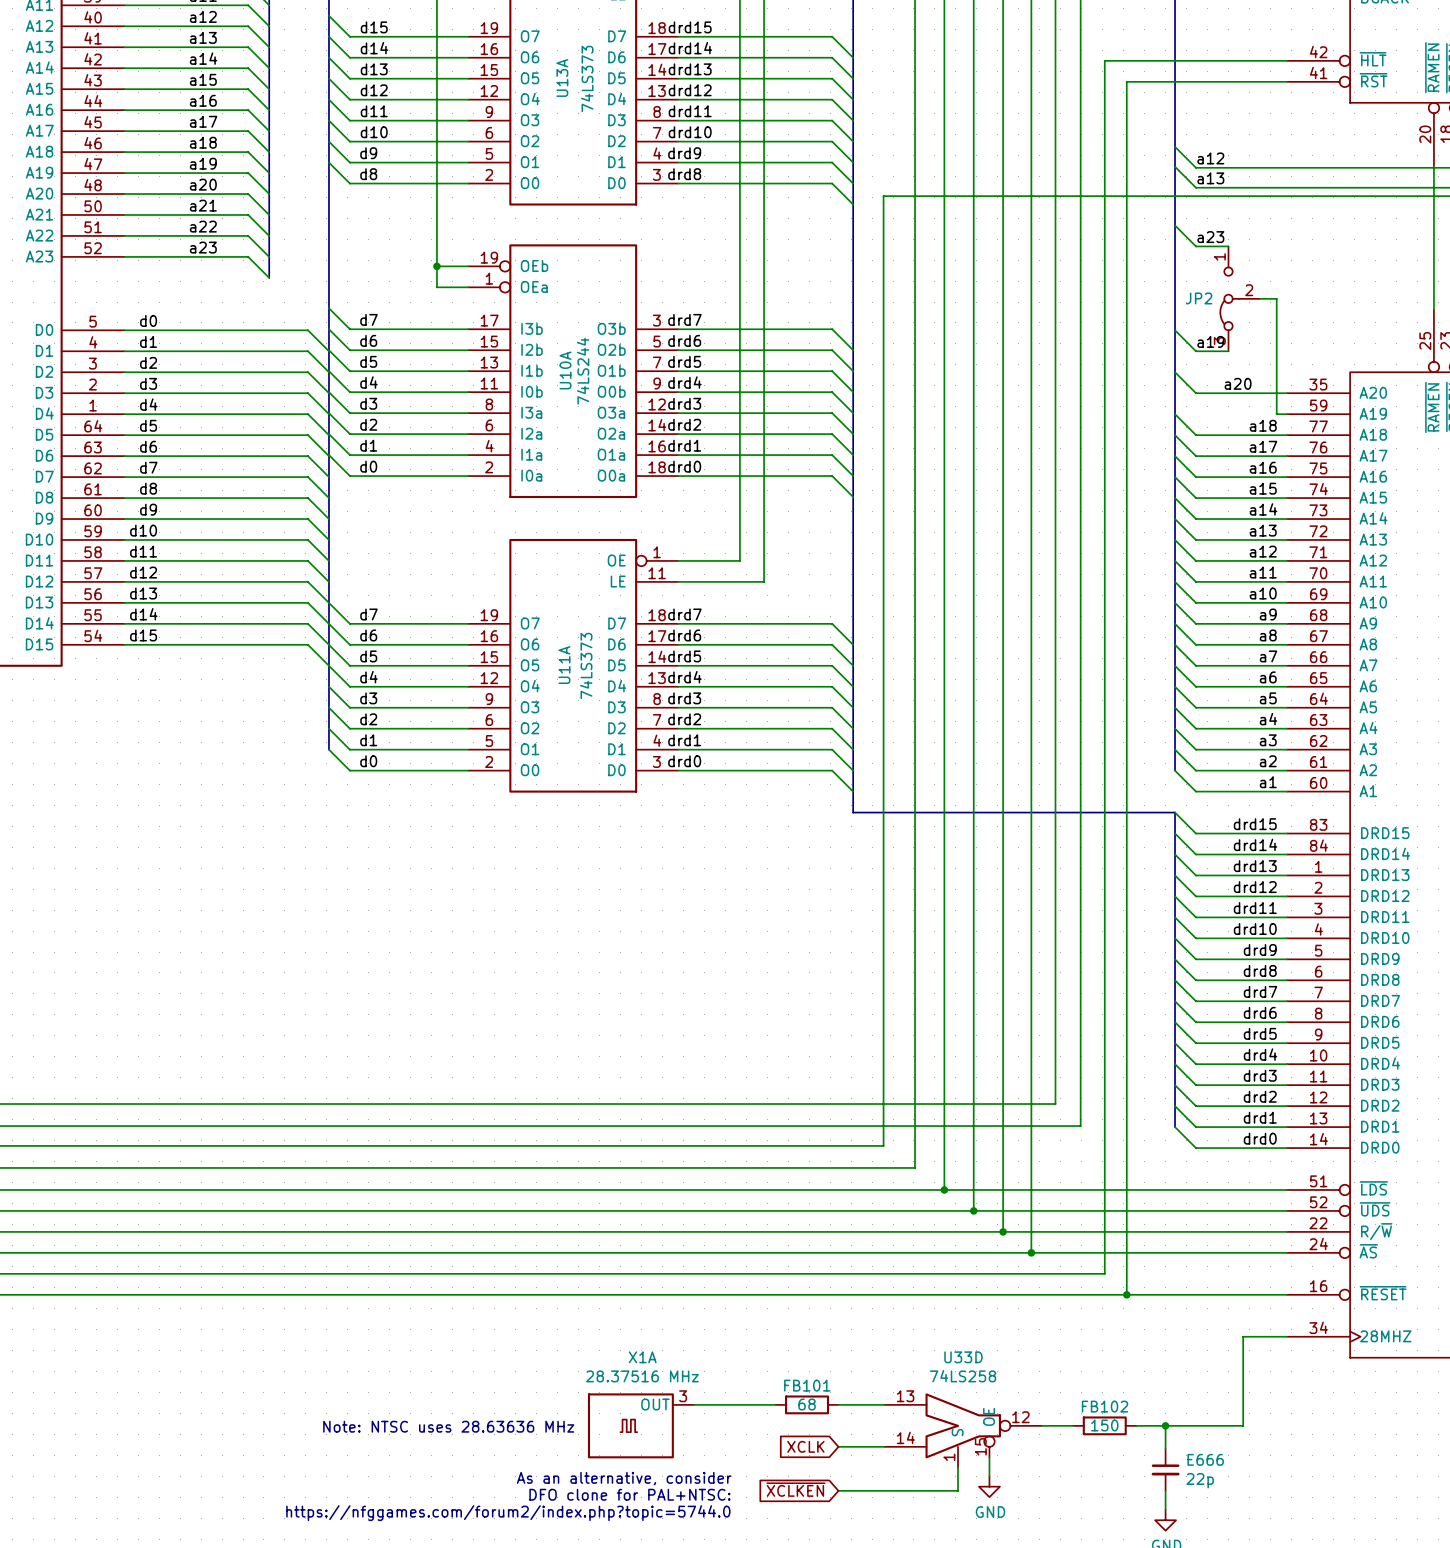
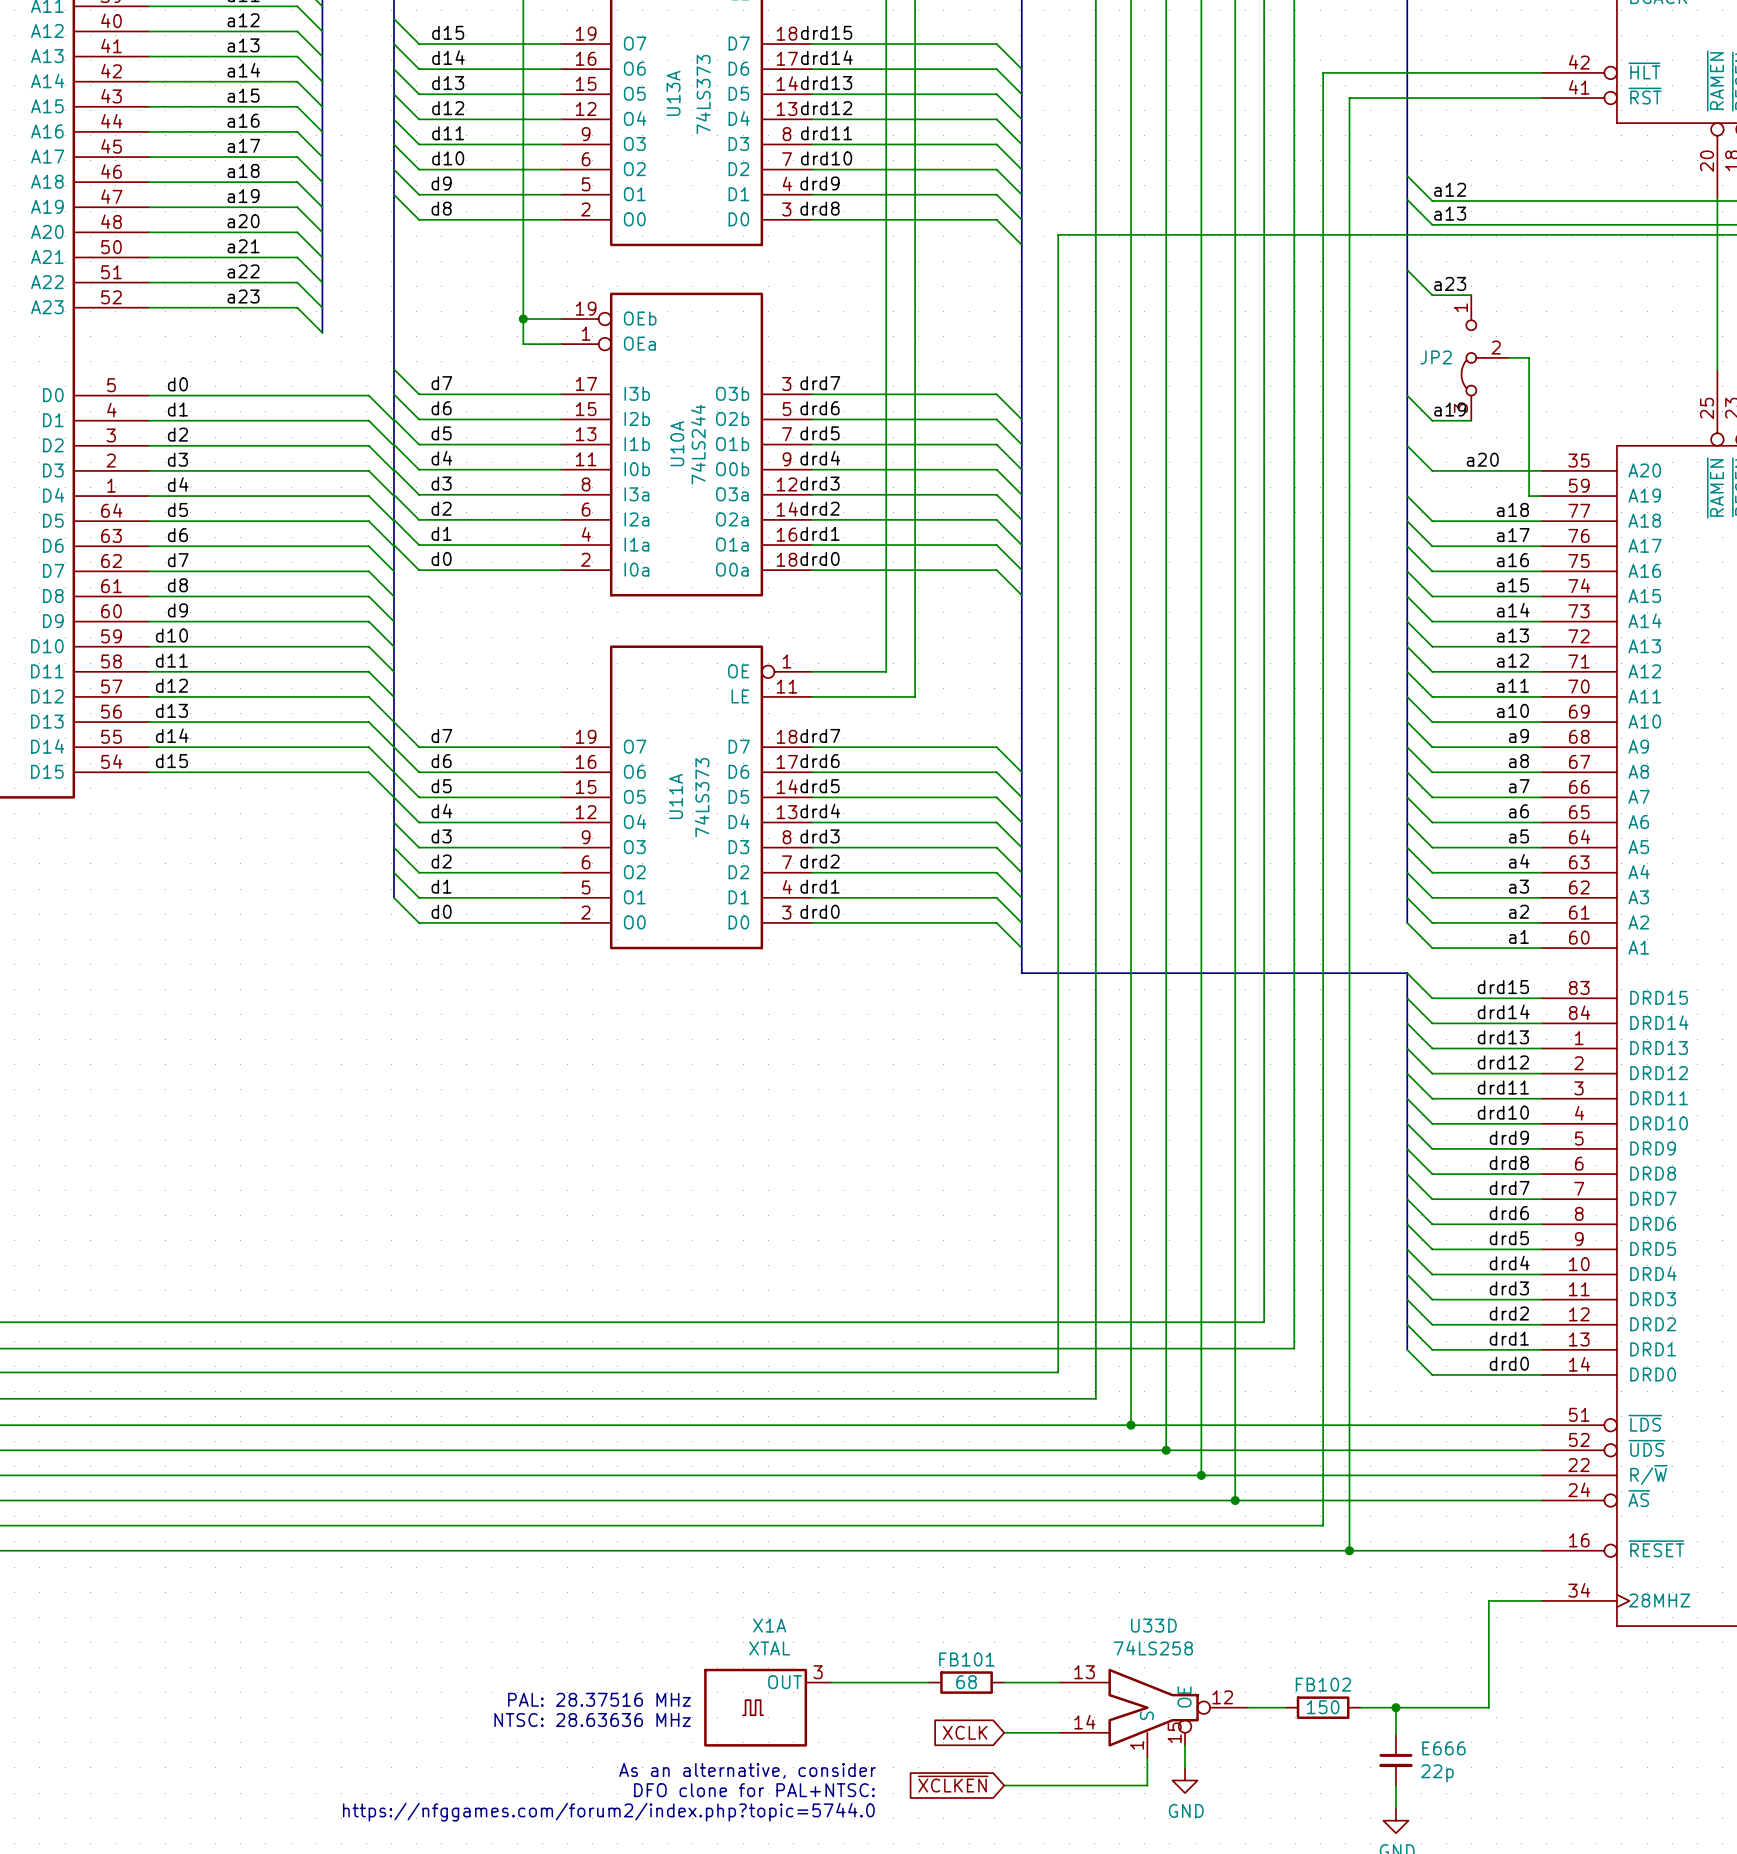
X1A value: 28.37516 MHz (642, 1376) -> XTAL (769, 1648)
text: none -> PAL: 28.37516 MHz (599, 1699)
text: Note: NTSC uses 28.63636 MHz (448, 1426) -> none
text: none -> NTSC: 28.63636 MHz (592, 1720)

